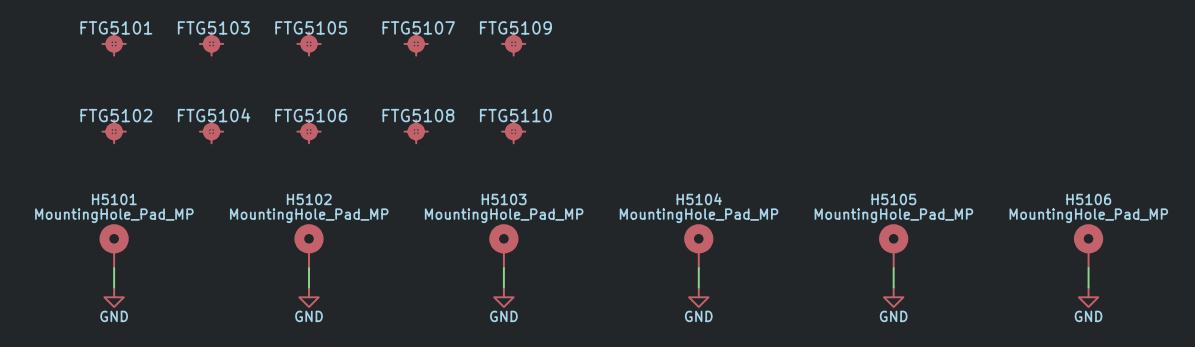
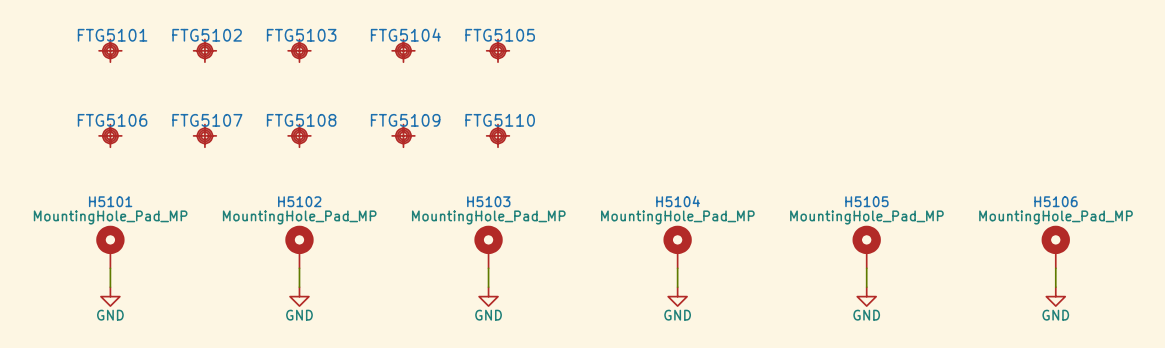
FTG5103 name: FTG5103 (213, 27) -> FTG5102 (207, 35)
FTG5105 name: FTG5105 (311, 27) -> FTG5103 (301, 35)
FTG5107 name: FTG5107 (418, 27) -> FTG5104 (405, 35)
FTG5109 name: FTG5109 (515, 27) -> FTG5105 (500, 35)
FTG5102 name: FTG5102 (116, 115) -> FTG5106 (112, 120)
FTG5104 name: FTG5104 (214, 115) -> FTG5107 (207, 120)
FTG5106 name: FTG5106 (311, 115) -> FTG5108 (301, 120)
FTG5108 name: FTG5108 (418, 115) -> FTG5109 (405, 120)

